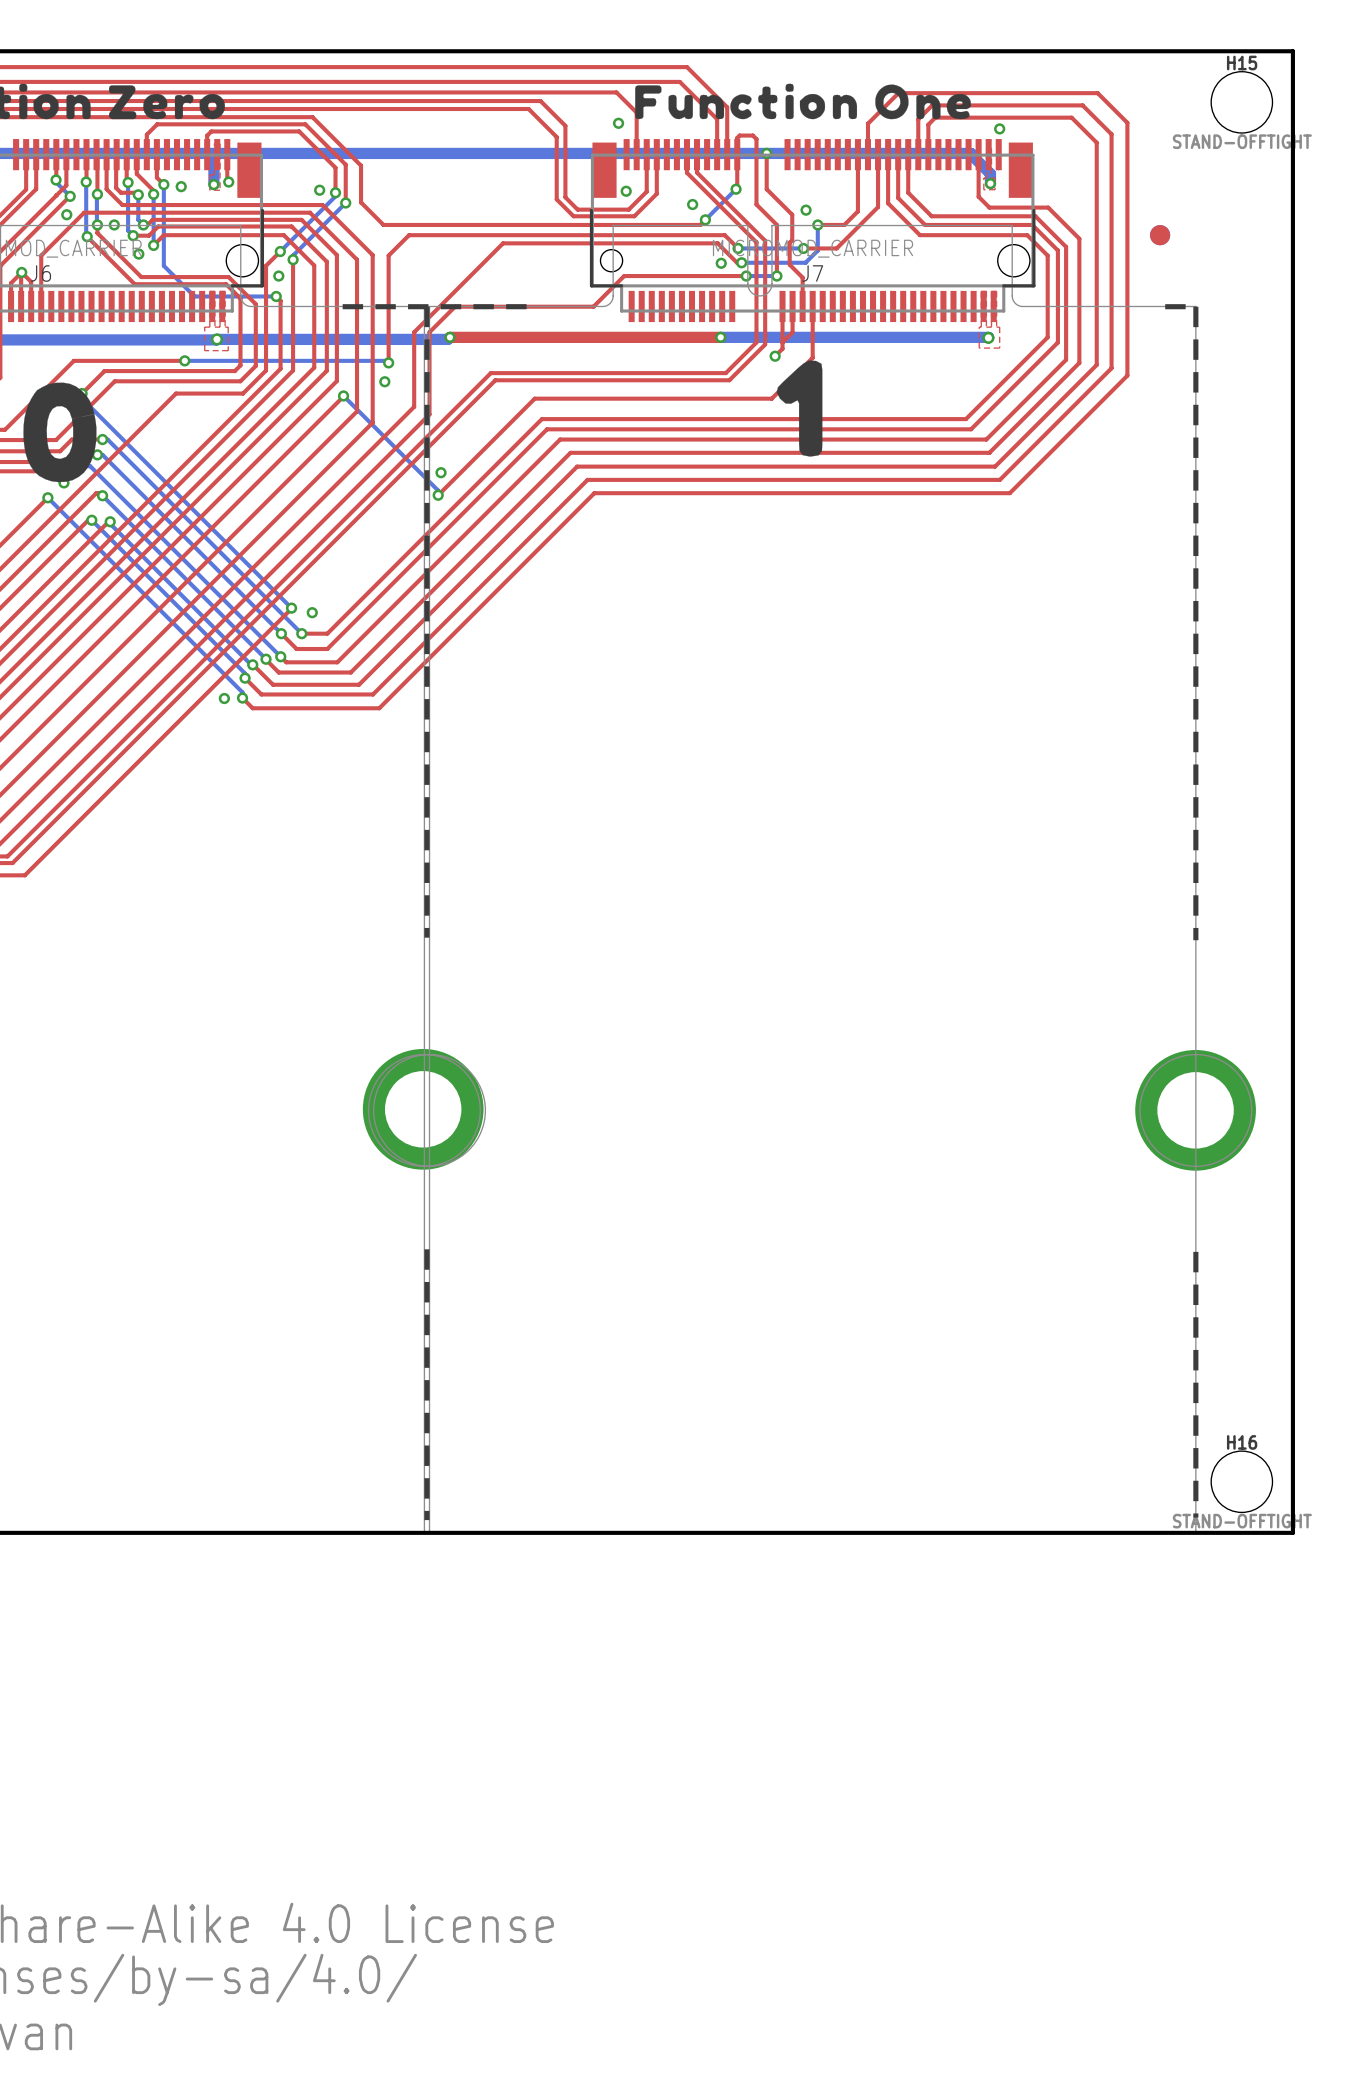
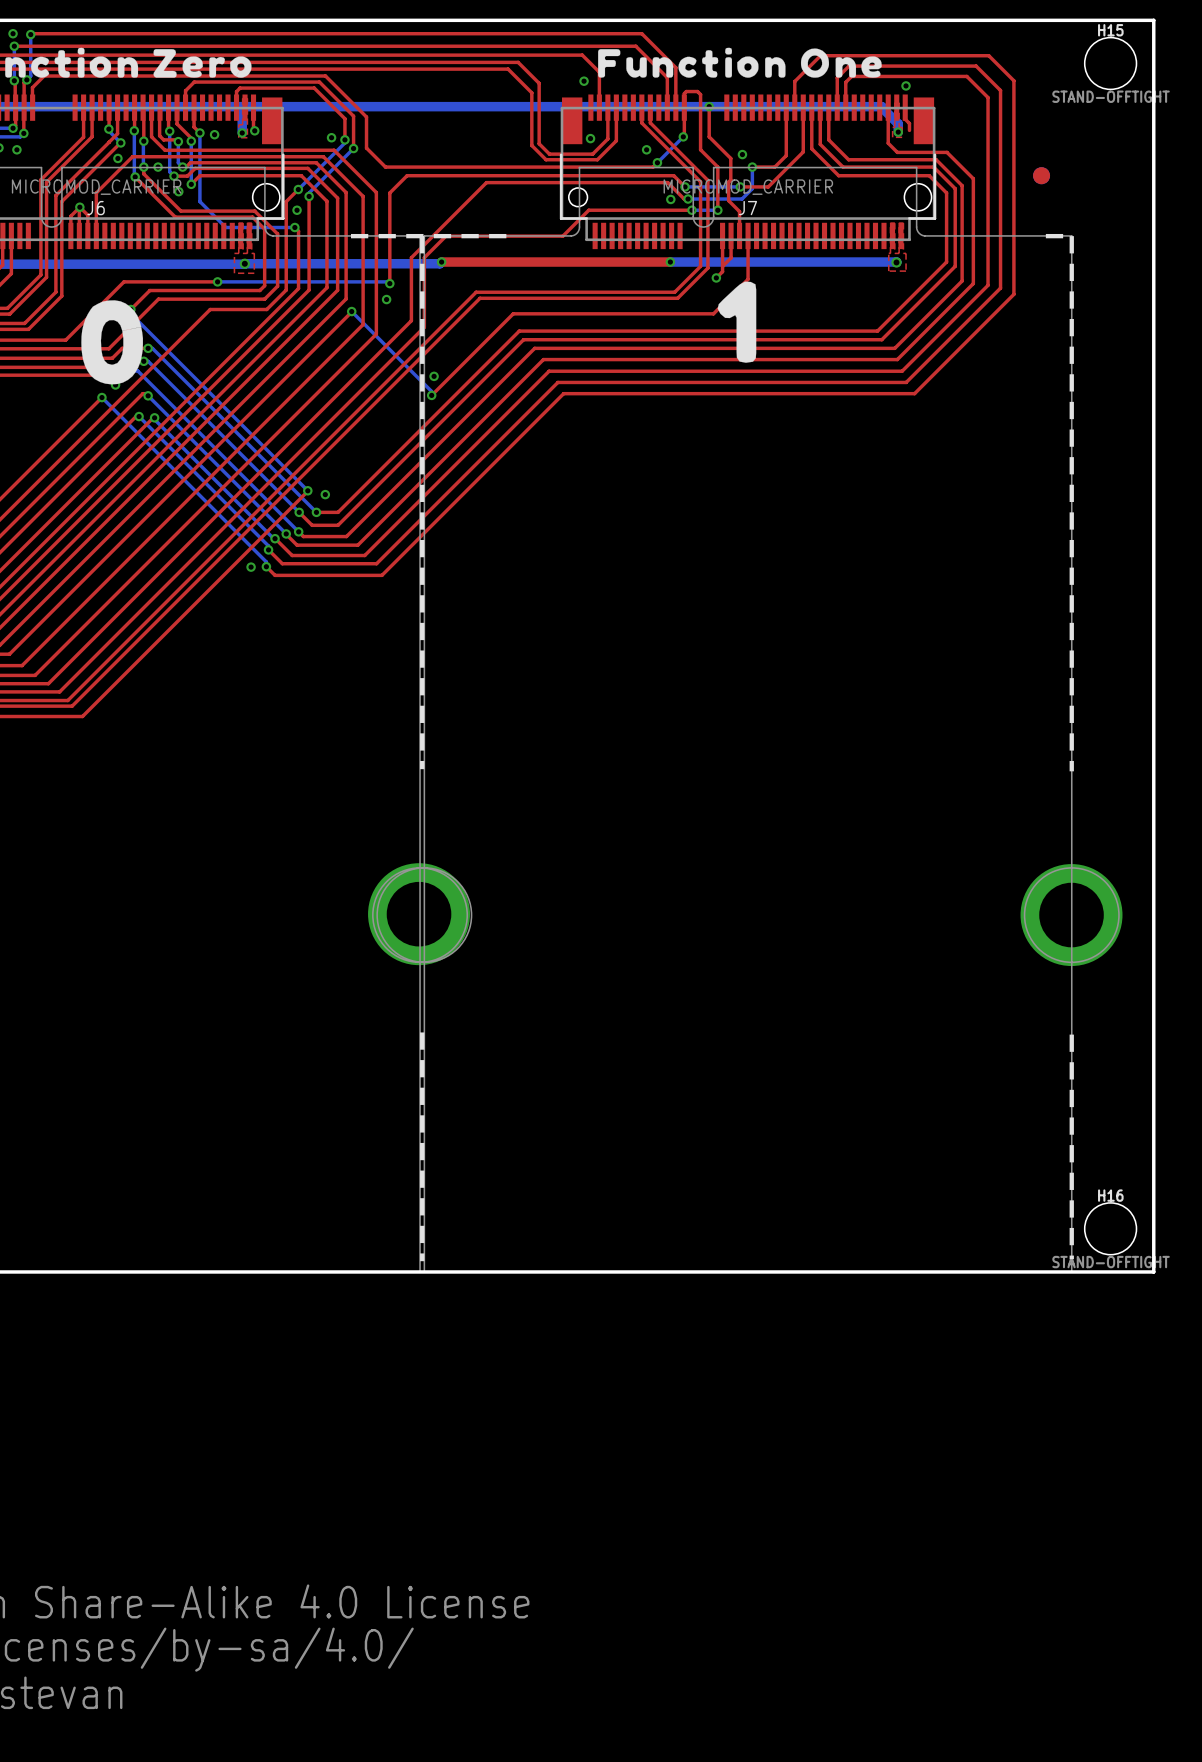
top track: none -> (905, 119) (909, 123) (909, 130)

